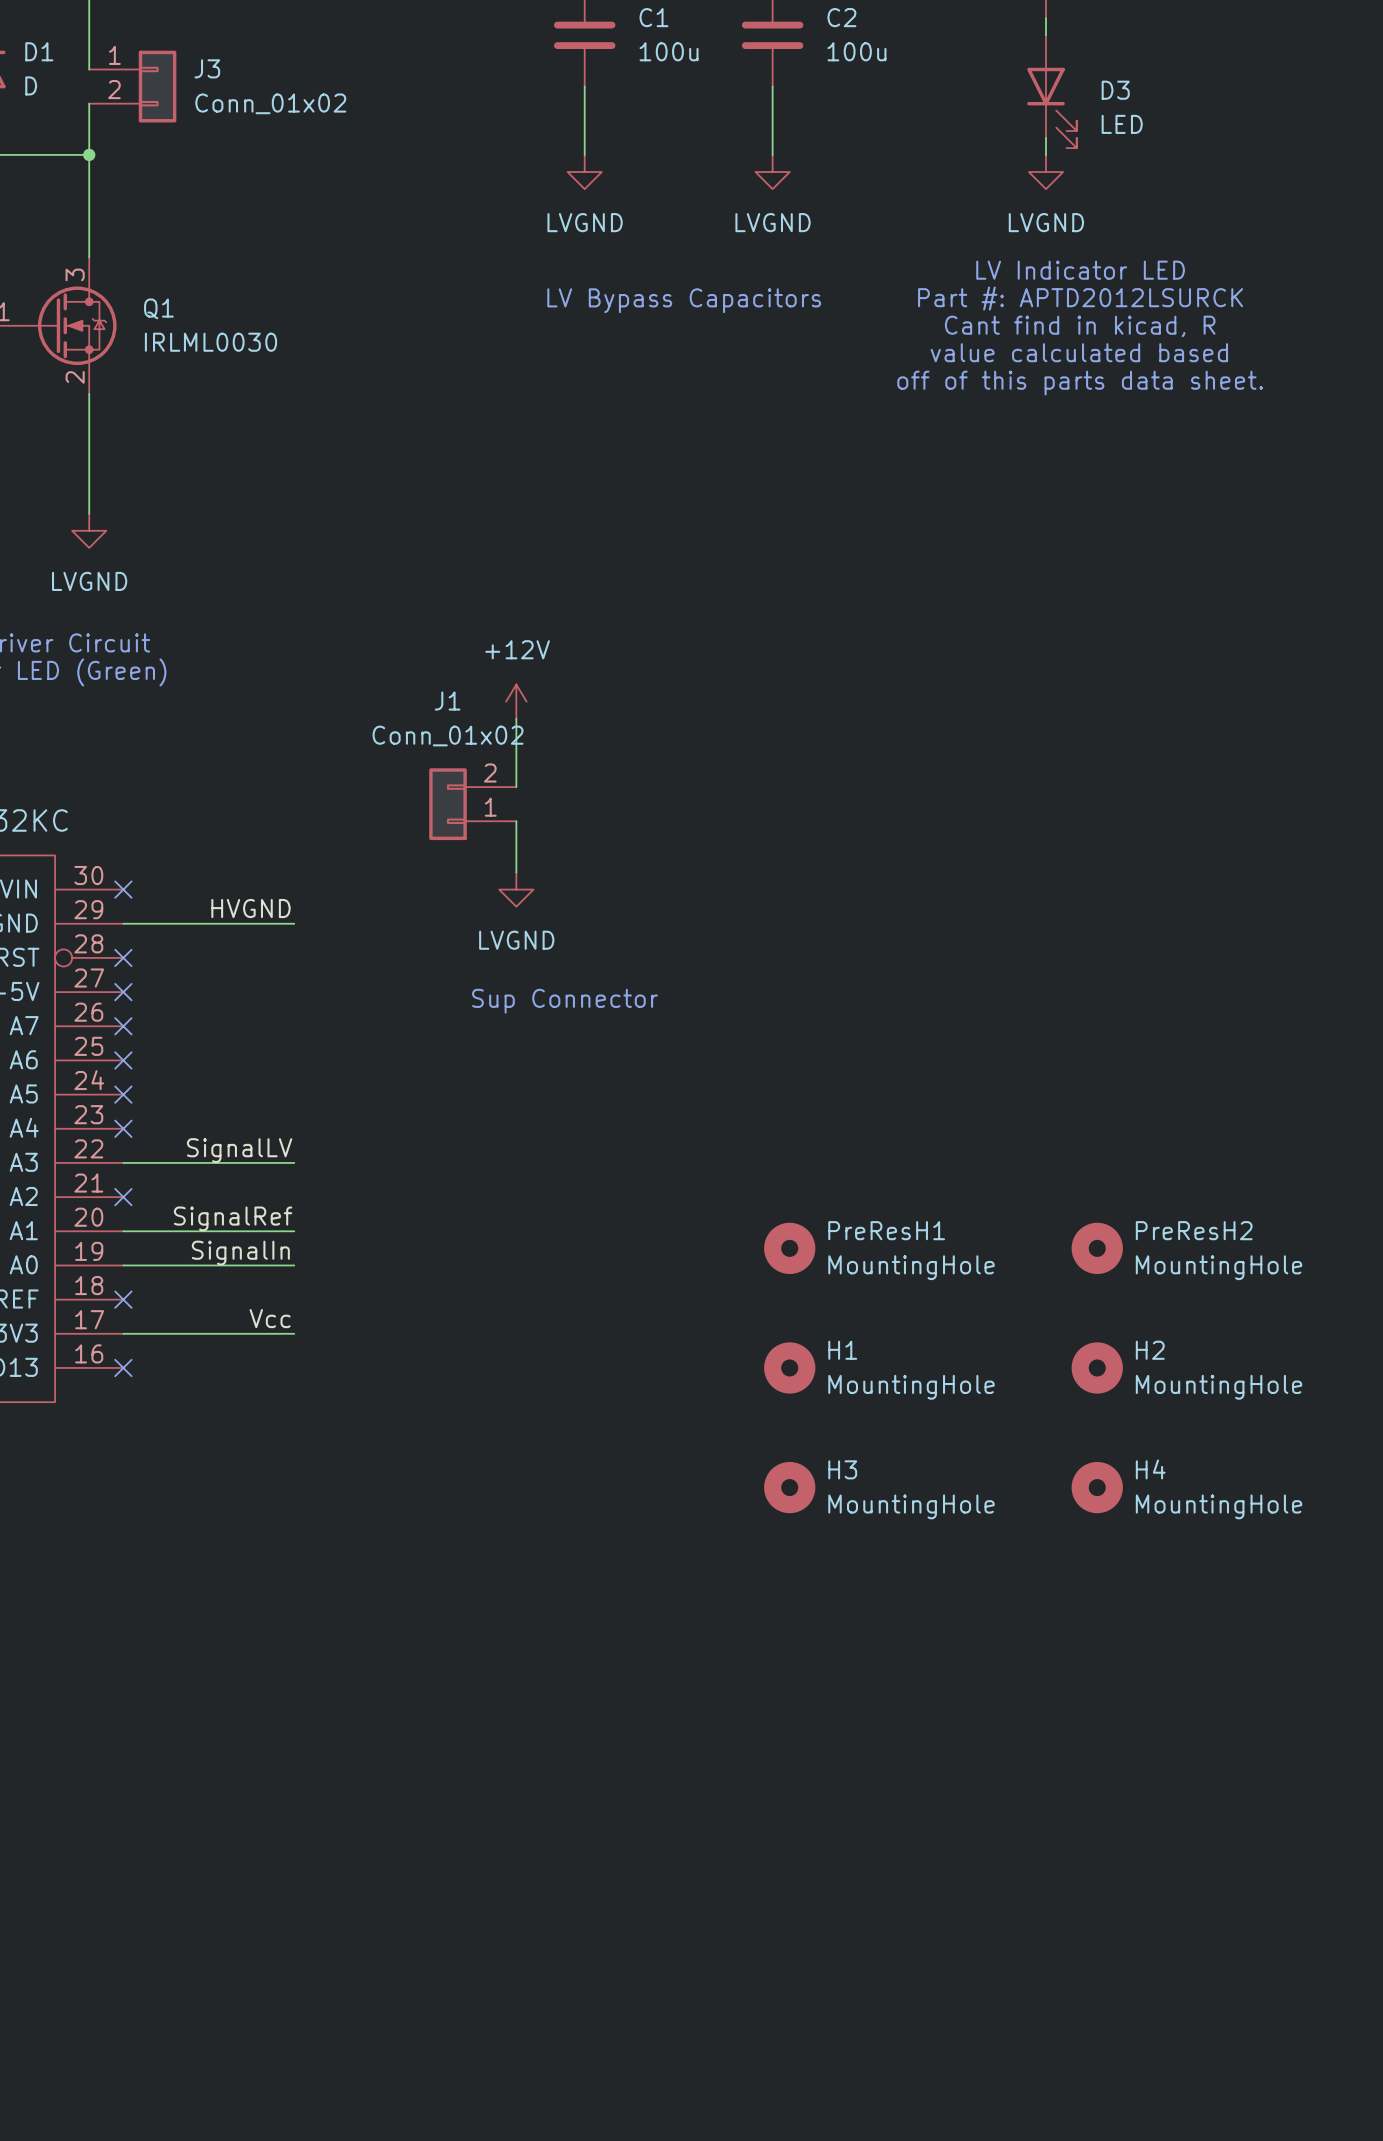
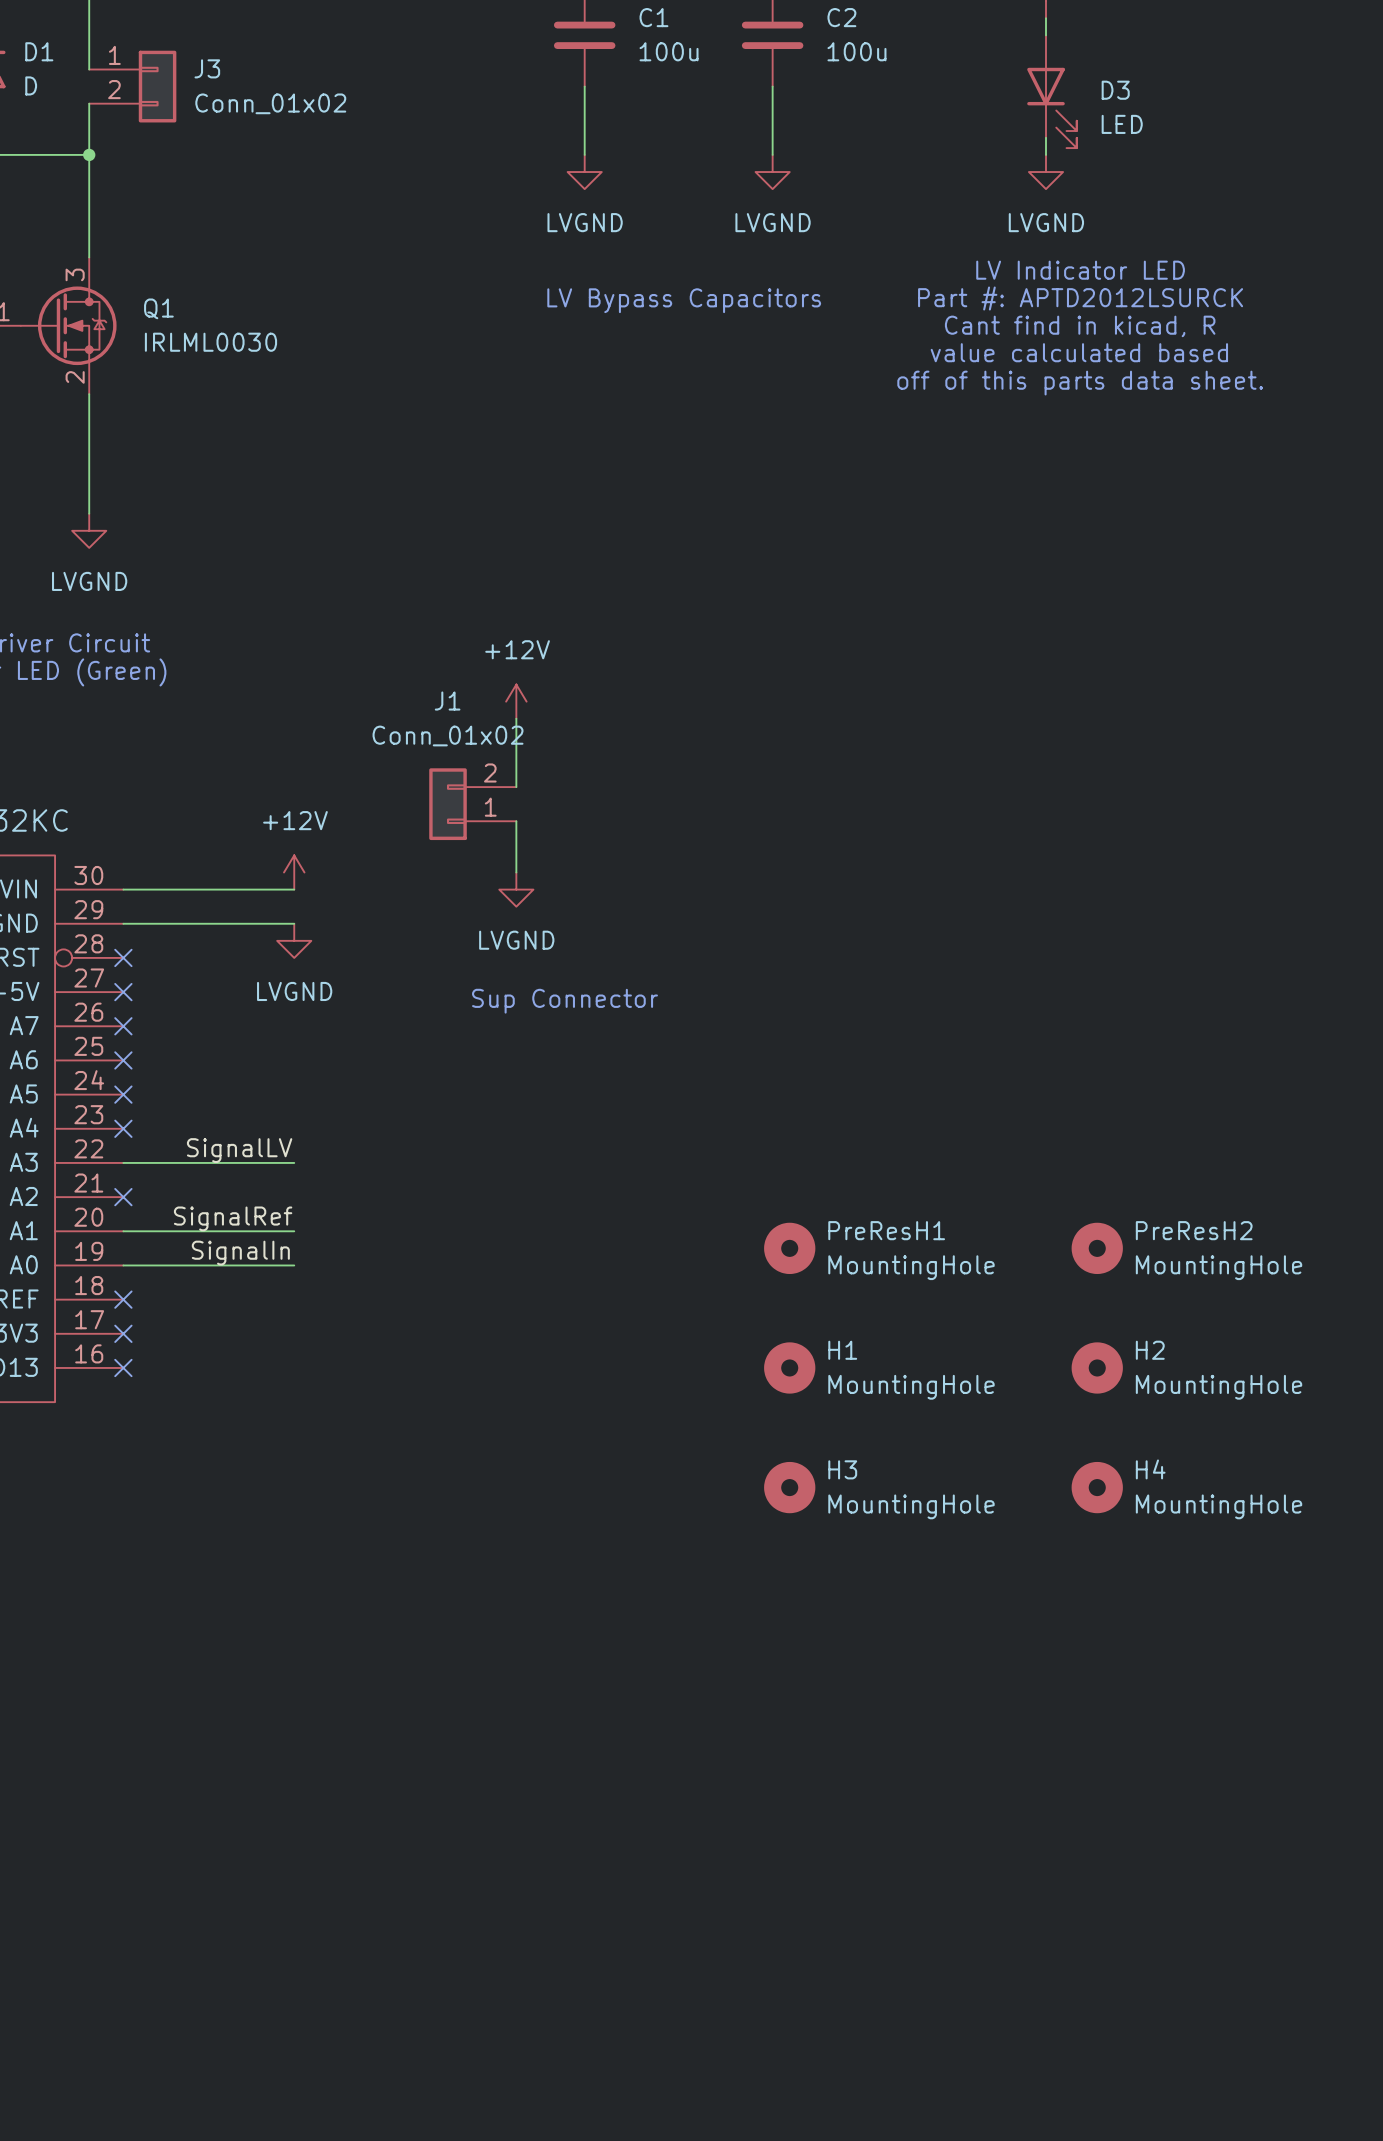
power symbol: none -> +12V (294, 872)
wire: none -> (123, 889) (294, 889)
no-connect mark: (123, 889) -> none
label: HVGND (251, 908) -> none
power symbol: none -> LVGND (294, 940)
label: Vcc (270, 1318) -> none
wire: (123, 1333) (294, 1333) -> none
no-connect mark: none -> (123, 1333)

